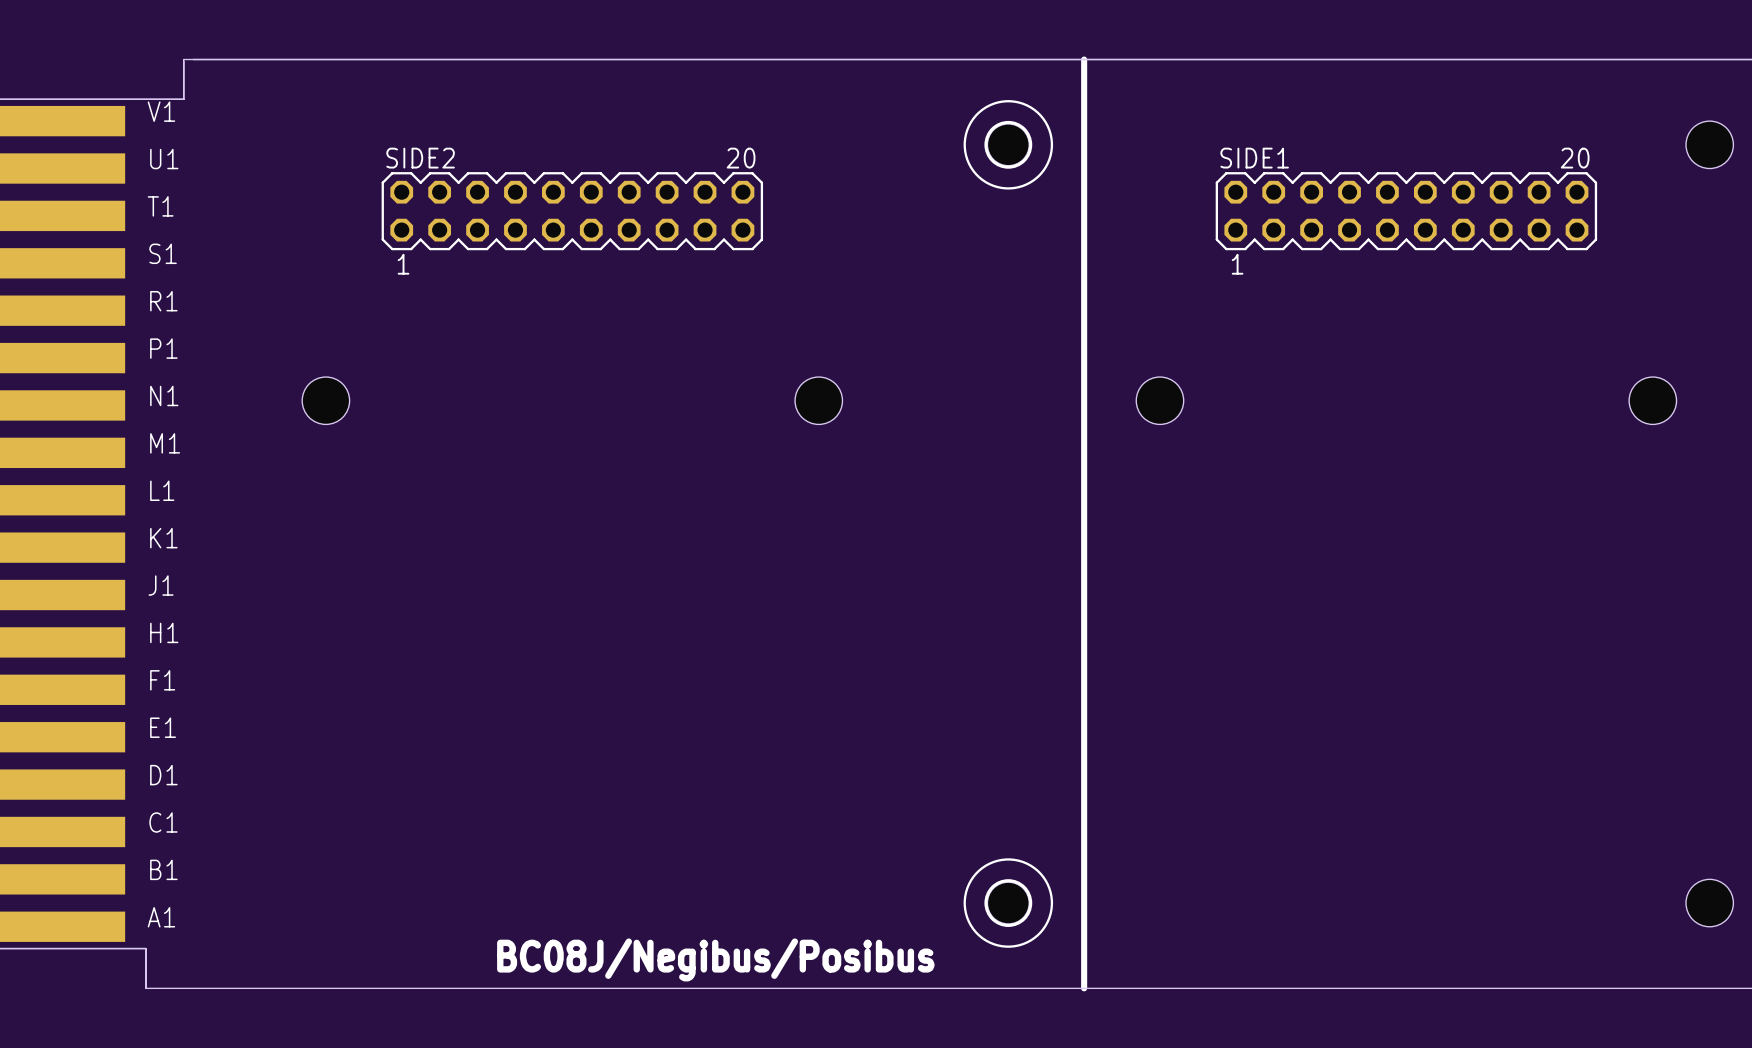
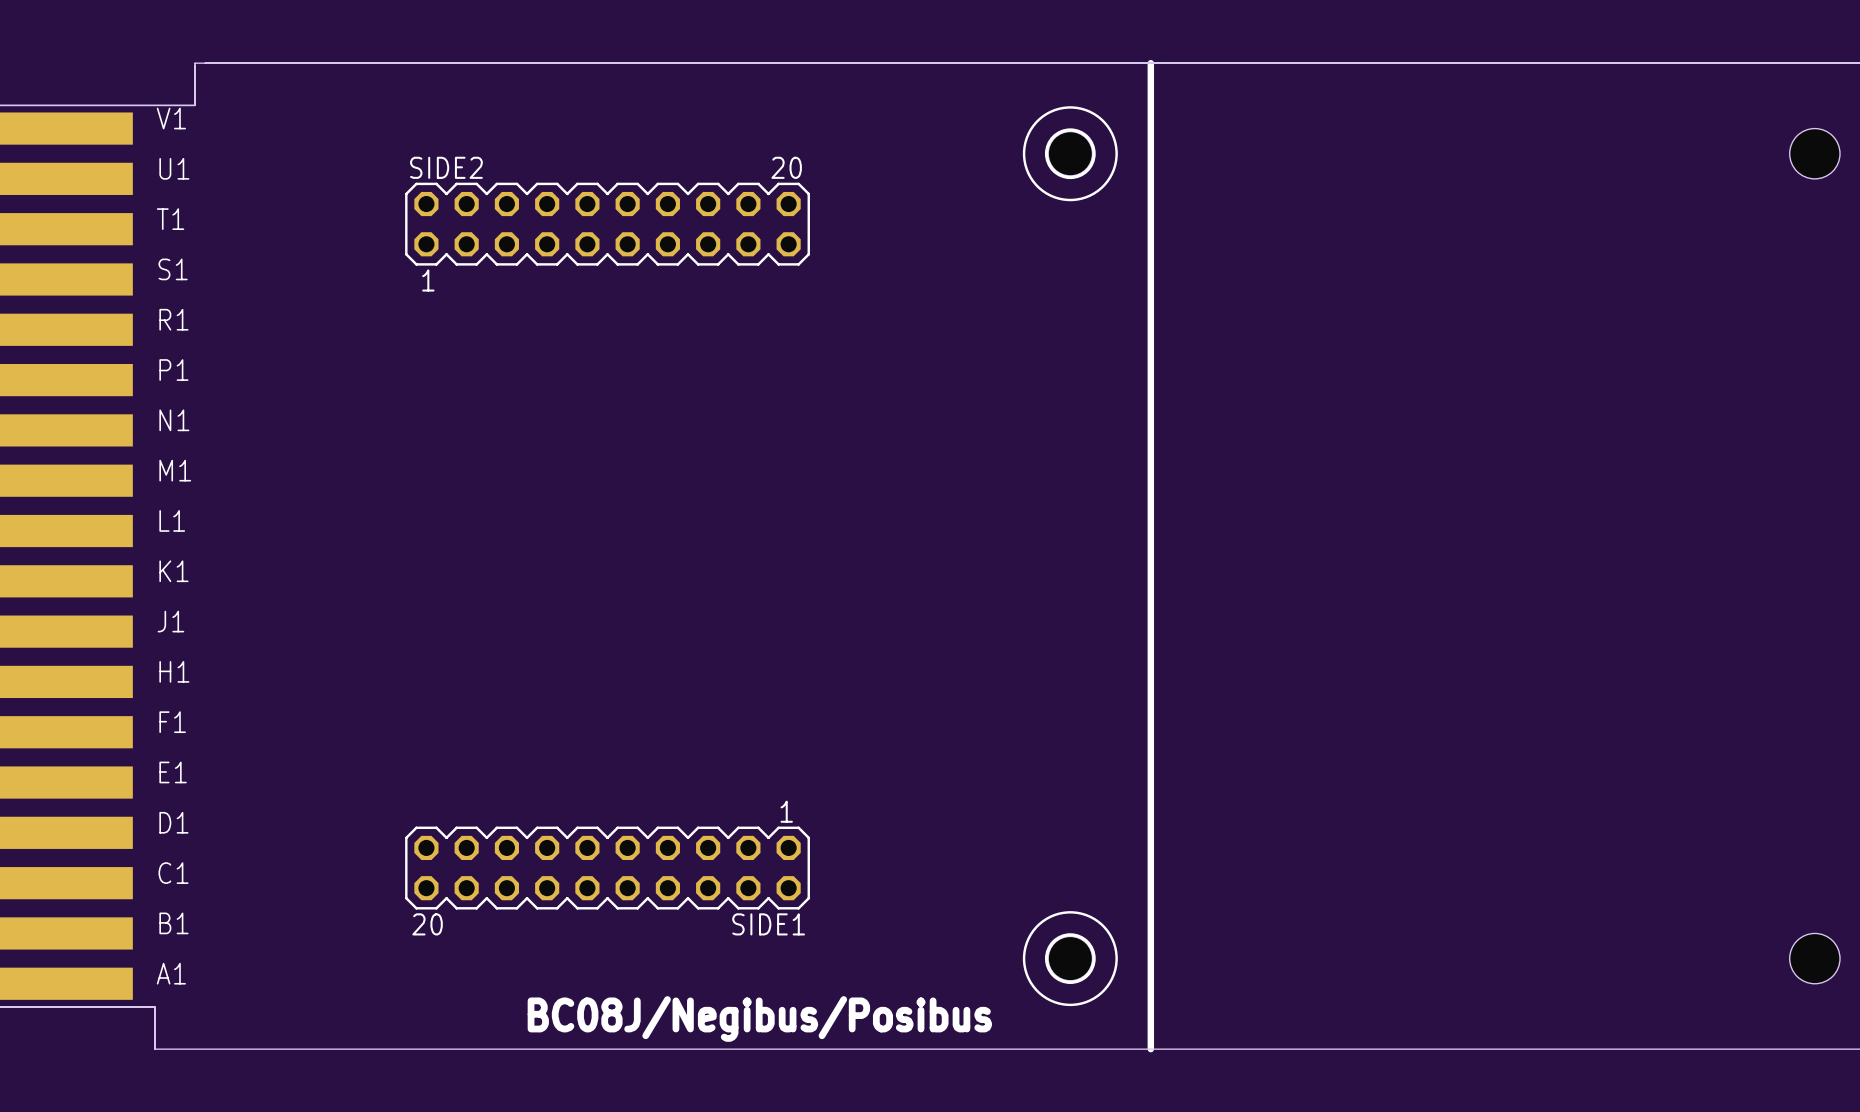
SIDE1 name position: SIDE1 (1254, 158) -> SIDE1 (768, 924)
SIDE1 text position: 20 (1575, 158) -> 20 (427, 924)
SIDE1 position: (1406, 211) -> (607, 868)
SIDE1 text position: 1 (1237, 264) -> 1 (786, 811)
hole: (325, 400) -> none
hole: (818, 400) -> none
hole: (1159, 400) -> none
hole: (1652, 400) -> none

